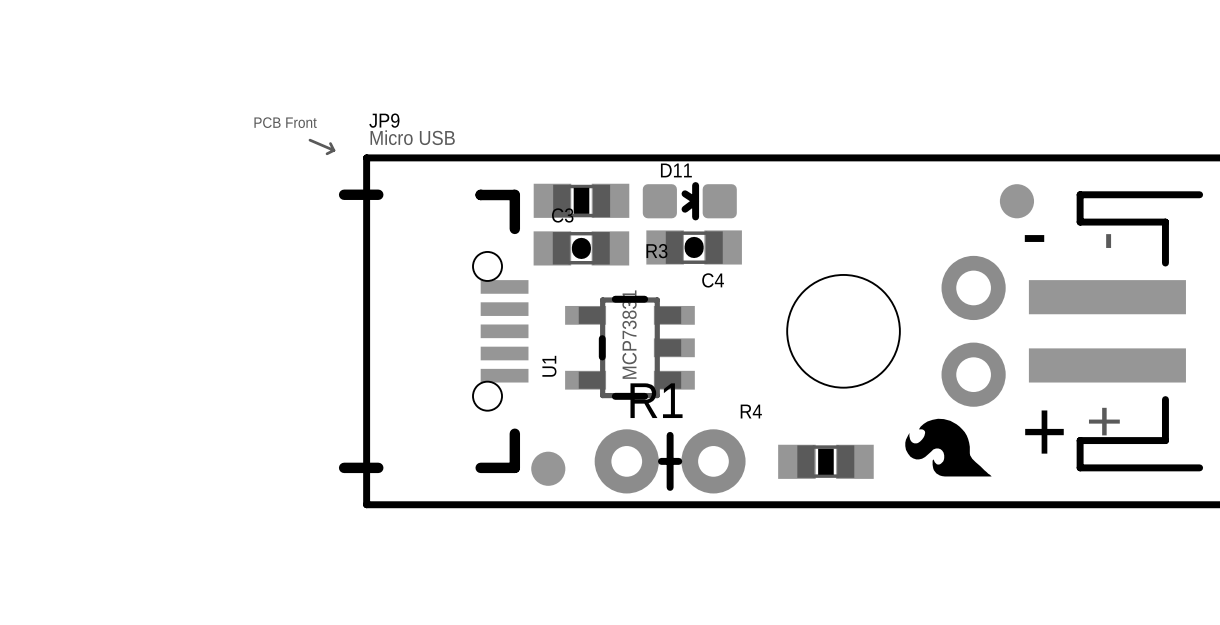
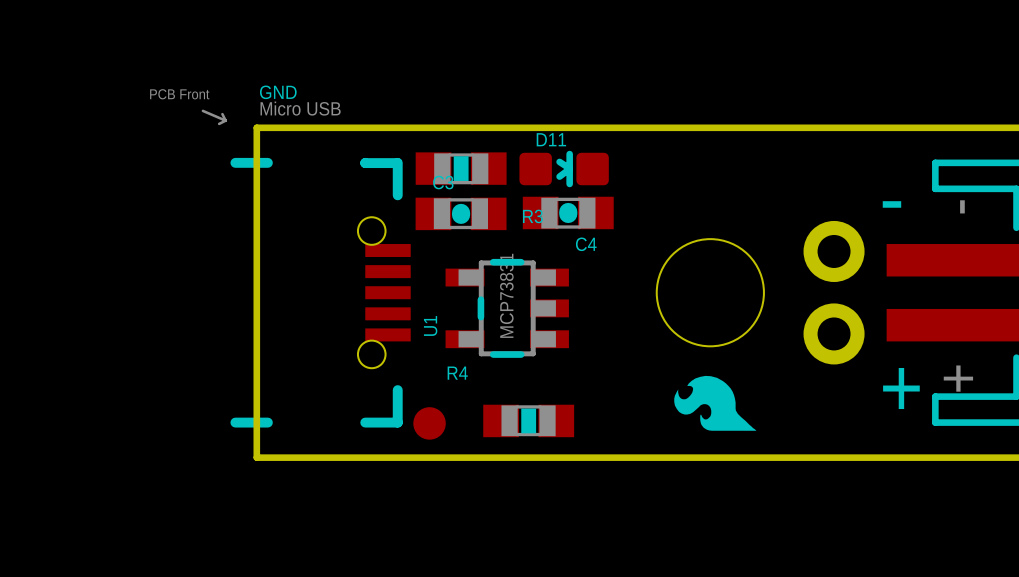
JP9 name: JP9 (384, 120) -> GND (278, 92)
part: (1016, 201) -> none
drawing position: (948, 447) -> (715, 403)
R1: (670, 461) -> none
R4 position: (825, 461) -> (528, 420)

